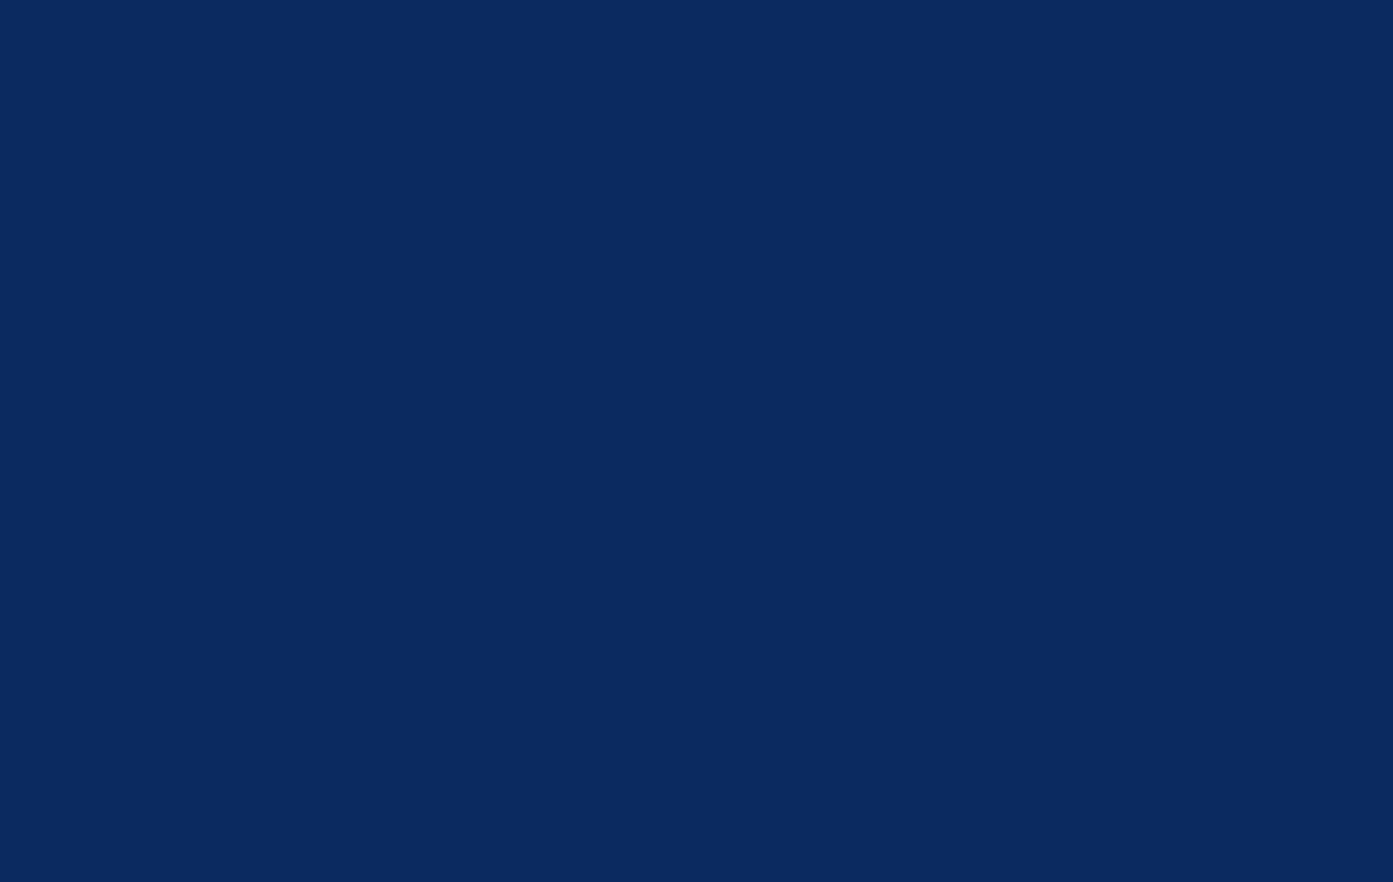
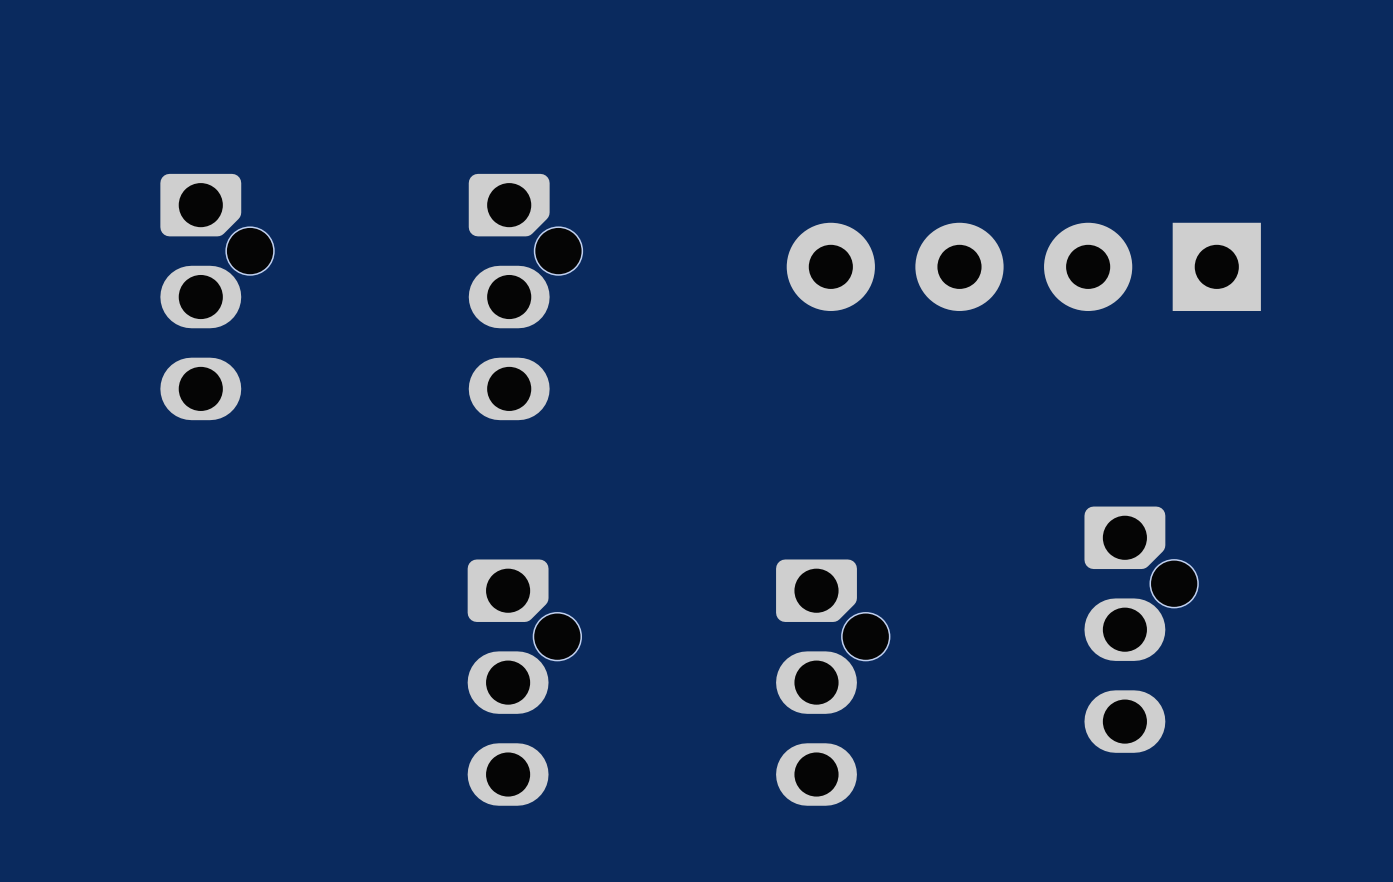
part: none -> (1023, 266)
part: none -> (217, 297)
part: none -> (525, 297)
part: none -> (1141, 629)
part: none -> (524, 682)
part: none -> (832, 682)

